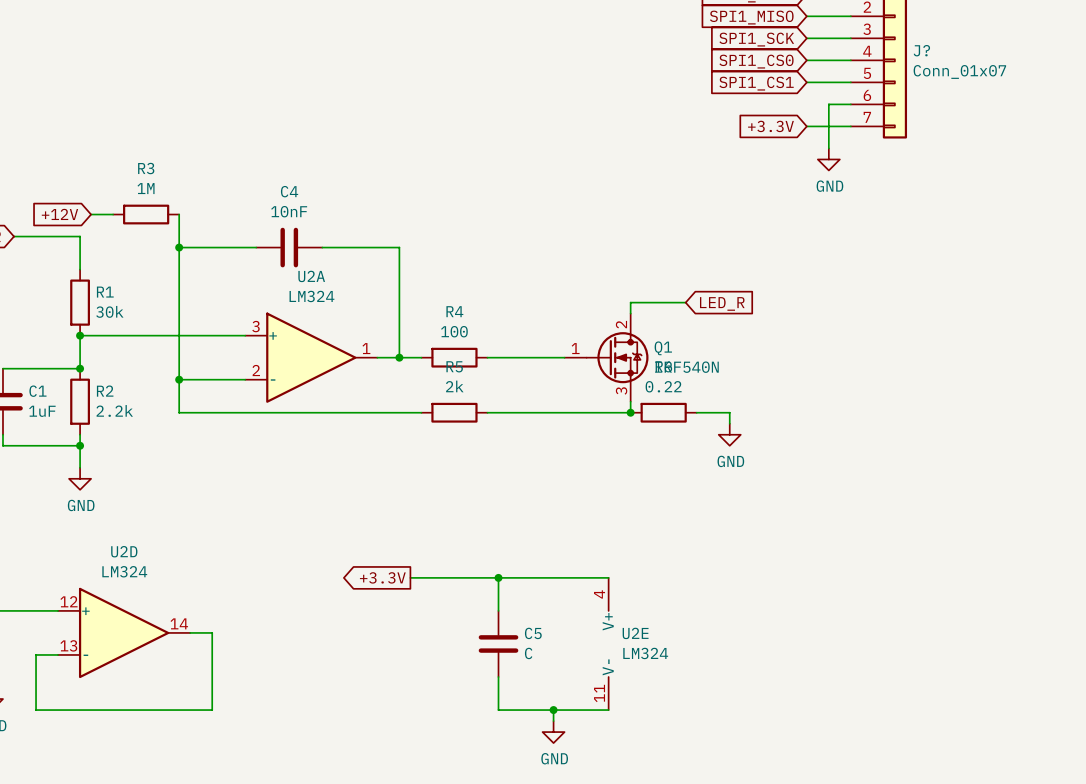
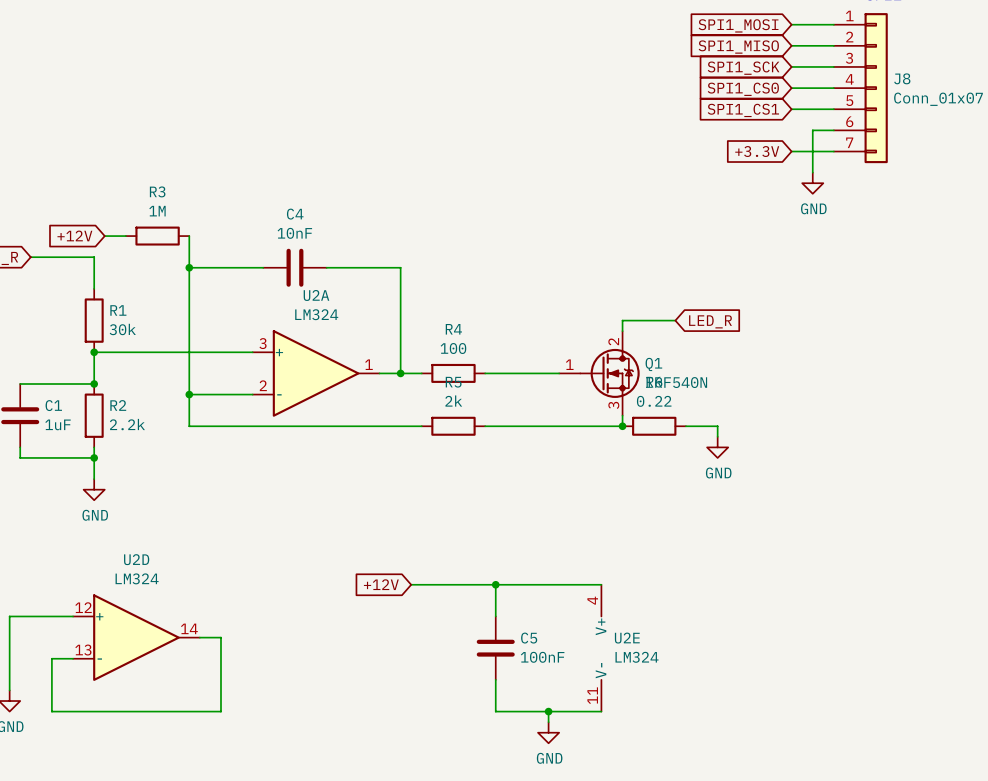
J? name: J? (921, 50) -> J8 (902, 78)
global label shape: output (382, 577) -> input (381, 584)
global label: +3.3V (382, 577) -> +12V (381, 584)
C5 value: C (528, 653) -> 100nF (542, 657)

